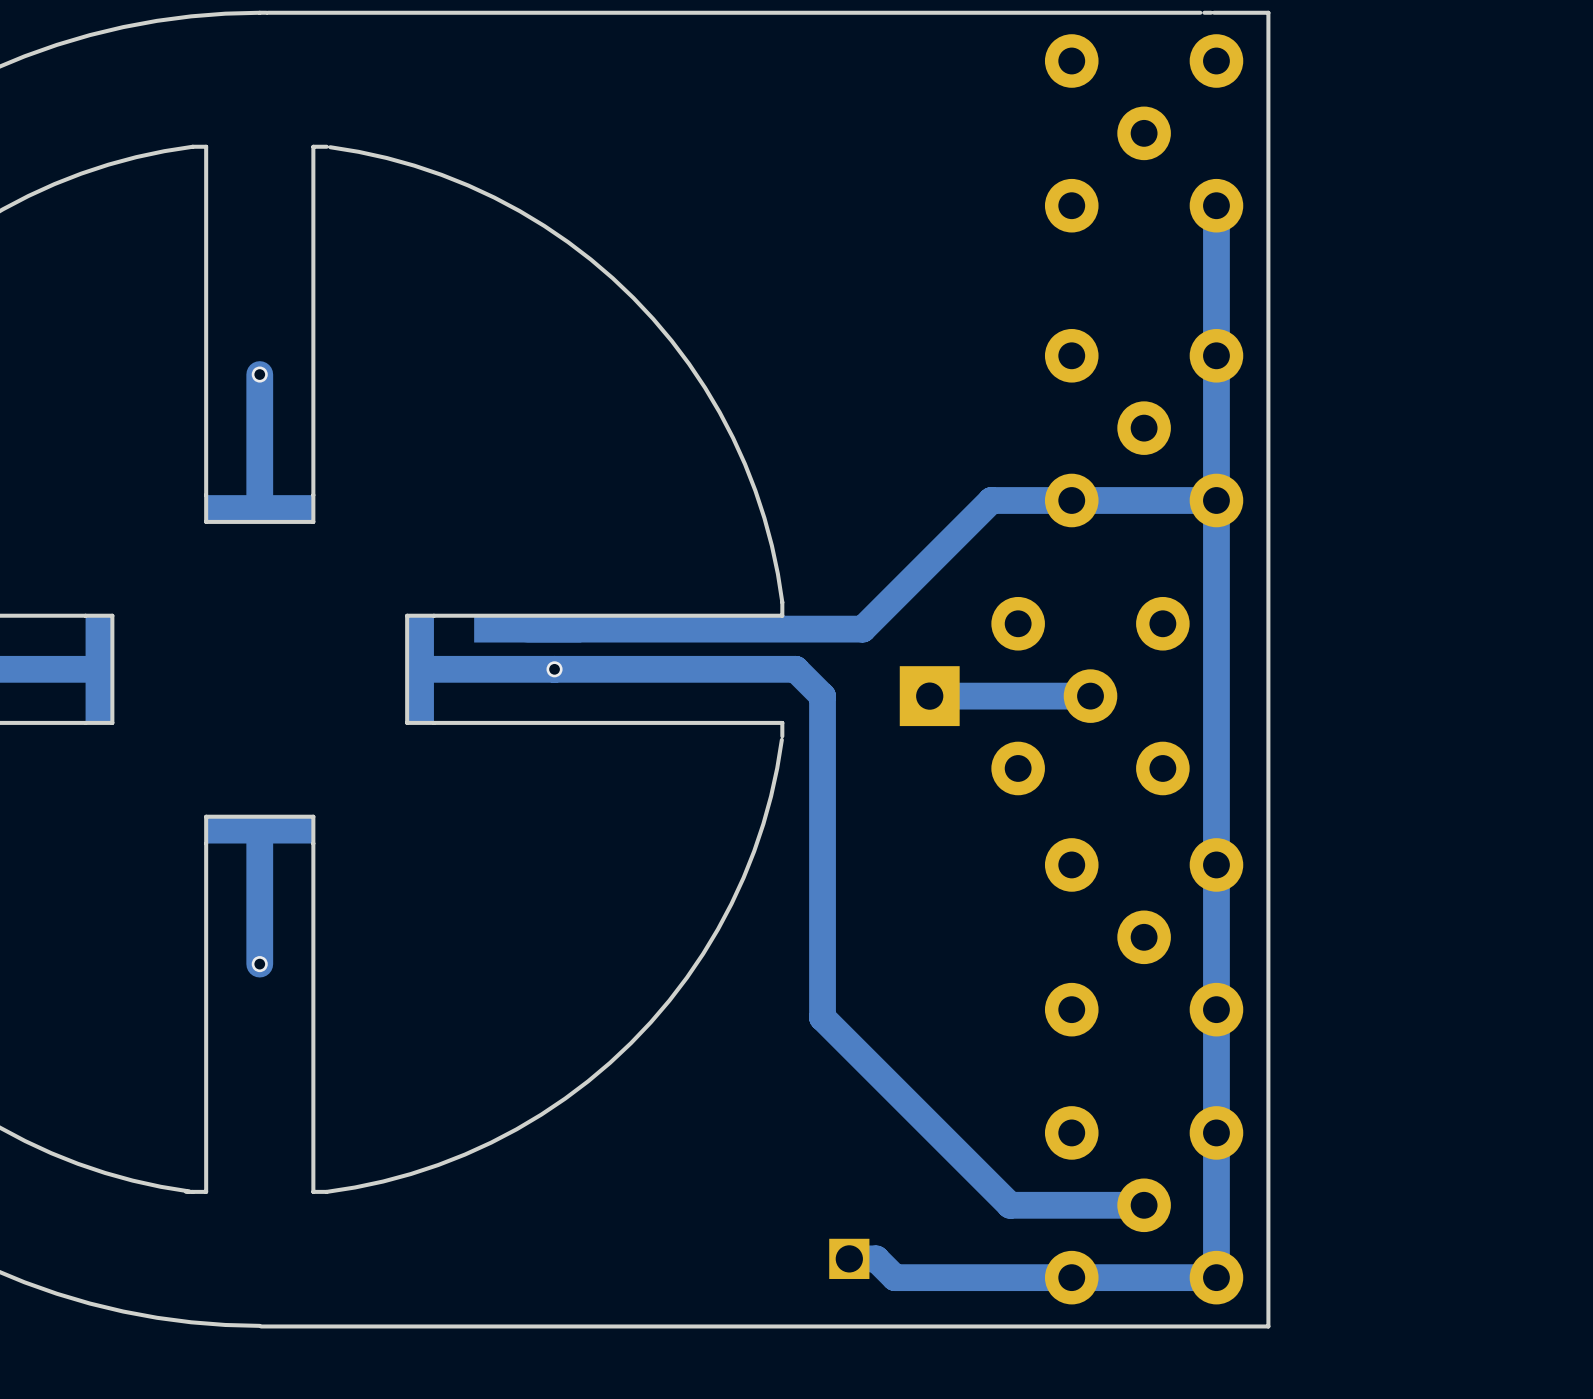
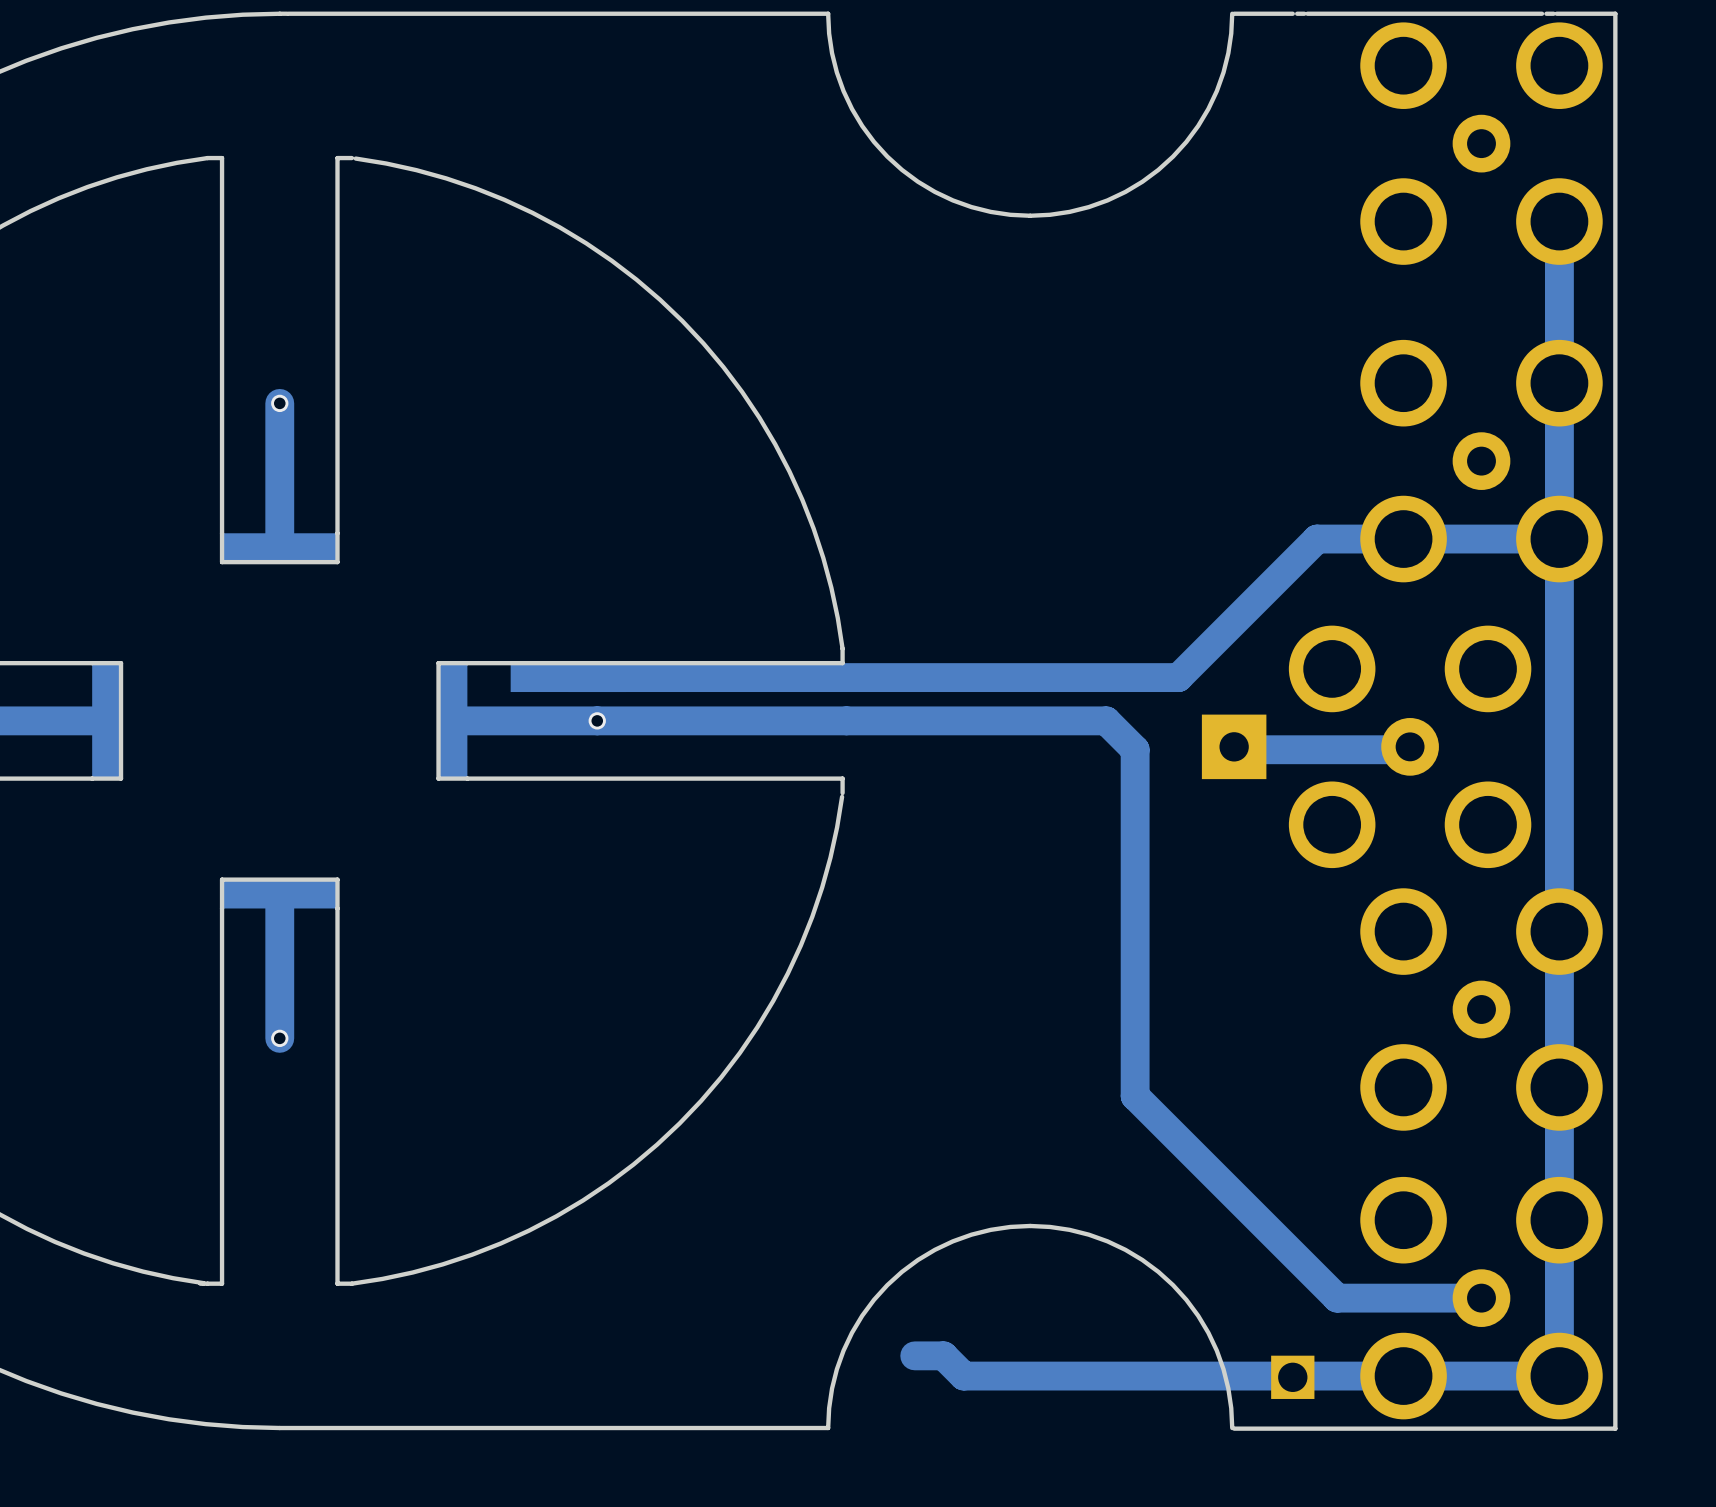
board edge: (1145, 12) (768, 12) -> (1232, 13) (1228, 53) (1216, 91) (1198, 125) (1173, 156) (1142, 181) (1107, 200) (1069, 211) (1030, 215) (990, 211) (952, 200) (917, 181) (887, 156) (862, 125) (843, 91) (832, 53) (828, 13)
board edge: (1268, 12) (1268, 1326) -> (1556, 13) (1615, 13) (1615, 1428) (1366, 1428)
board edge: none -> (1542, 13) (1366, 13)
board edge: none -> (1553, 13) (1546, 13)
part: (1144, 133) -> none
part: none -> (1481, 143)
track: (1216, 205) (1216, 1277) -> (1559, 221) (1559, 1376) (1310, 1376)
part: (1144, 428) -> none
part: none -> (1481, 461)
track: (1216, 500) (991, 500) (862, 629) -> (1559, 539) (1316, 539) (1178, 677) (929, 677)
track: (795, 669) (822, 696) (822, 1017) (1010, 1205) (1144, 1205) -> (857, 720) (1106, 720) (1135, 749) (1135, 1096) (1337, 1298) (1481, 1298)
part: none -> (1410, 746)
part position: (929, 696) -> (1234, 746)
track: (1090, 696) (929, 696) -> (1423, 749) (1250, 749)
part: (1090, 696) -> none
part: (1144, 937) -> none
part: none -> (1481, 1009)
part: (1144, 1205) -> none
part: none -> (1481, 1298)
part position: (849, 1258) -> (1292, 1377)
board edge: none -> (1232, 1428) (1228, 1388) (1216, 1350) (1198, 1315) (1173, 1285) (1142, 1260) (1107, 1241) (1069, 1229) (1030, 1225) (990, 1229) (952, 1241) (917, 1260) (887, 1285) (862, 1315) (843, 1350) (832, 1388) (828, 1428) (279, 1428)
board edge: (1145, 1326) (260, 1326) -> none

